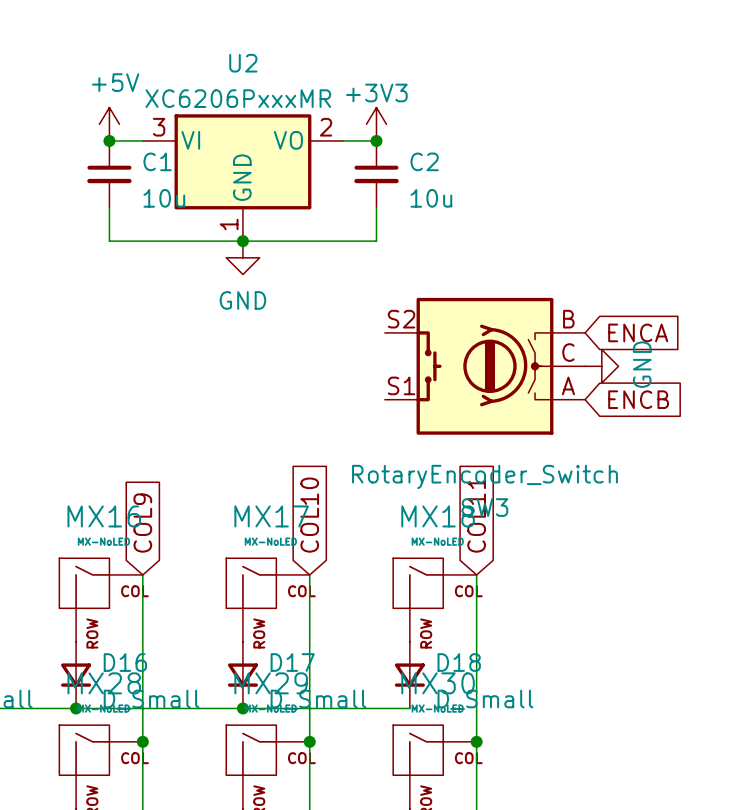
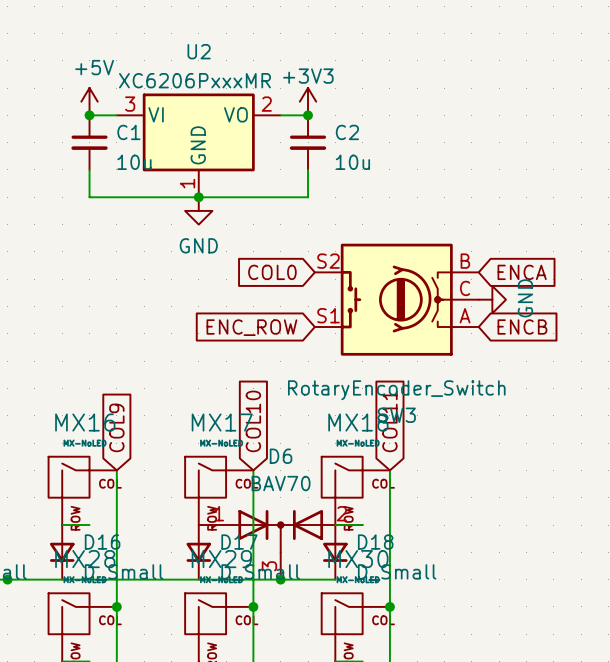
global label: none -> COL0 (272, 272)
global label: none -> ENC_ROW (251, 327)
wire: none -> (62, 525) (89, 525)
wire: none -> (335, 525) (362, 525)
D6: none -> BAV70 (280, 544)
junction: none -> (7, 579)
junction: (76, 708) -> none
junction: (242, 708) -> none
junction: none -> (280, 579)
wire: none -> (62, 661) (89, 661)
wire: none -> (335, 661) (362, 661)

